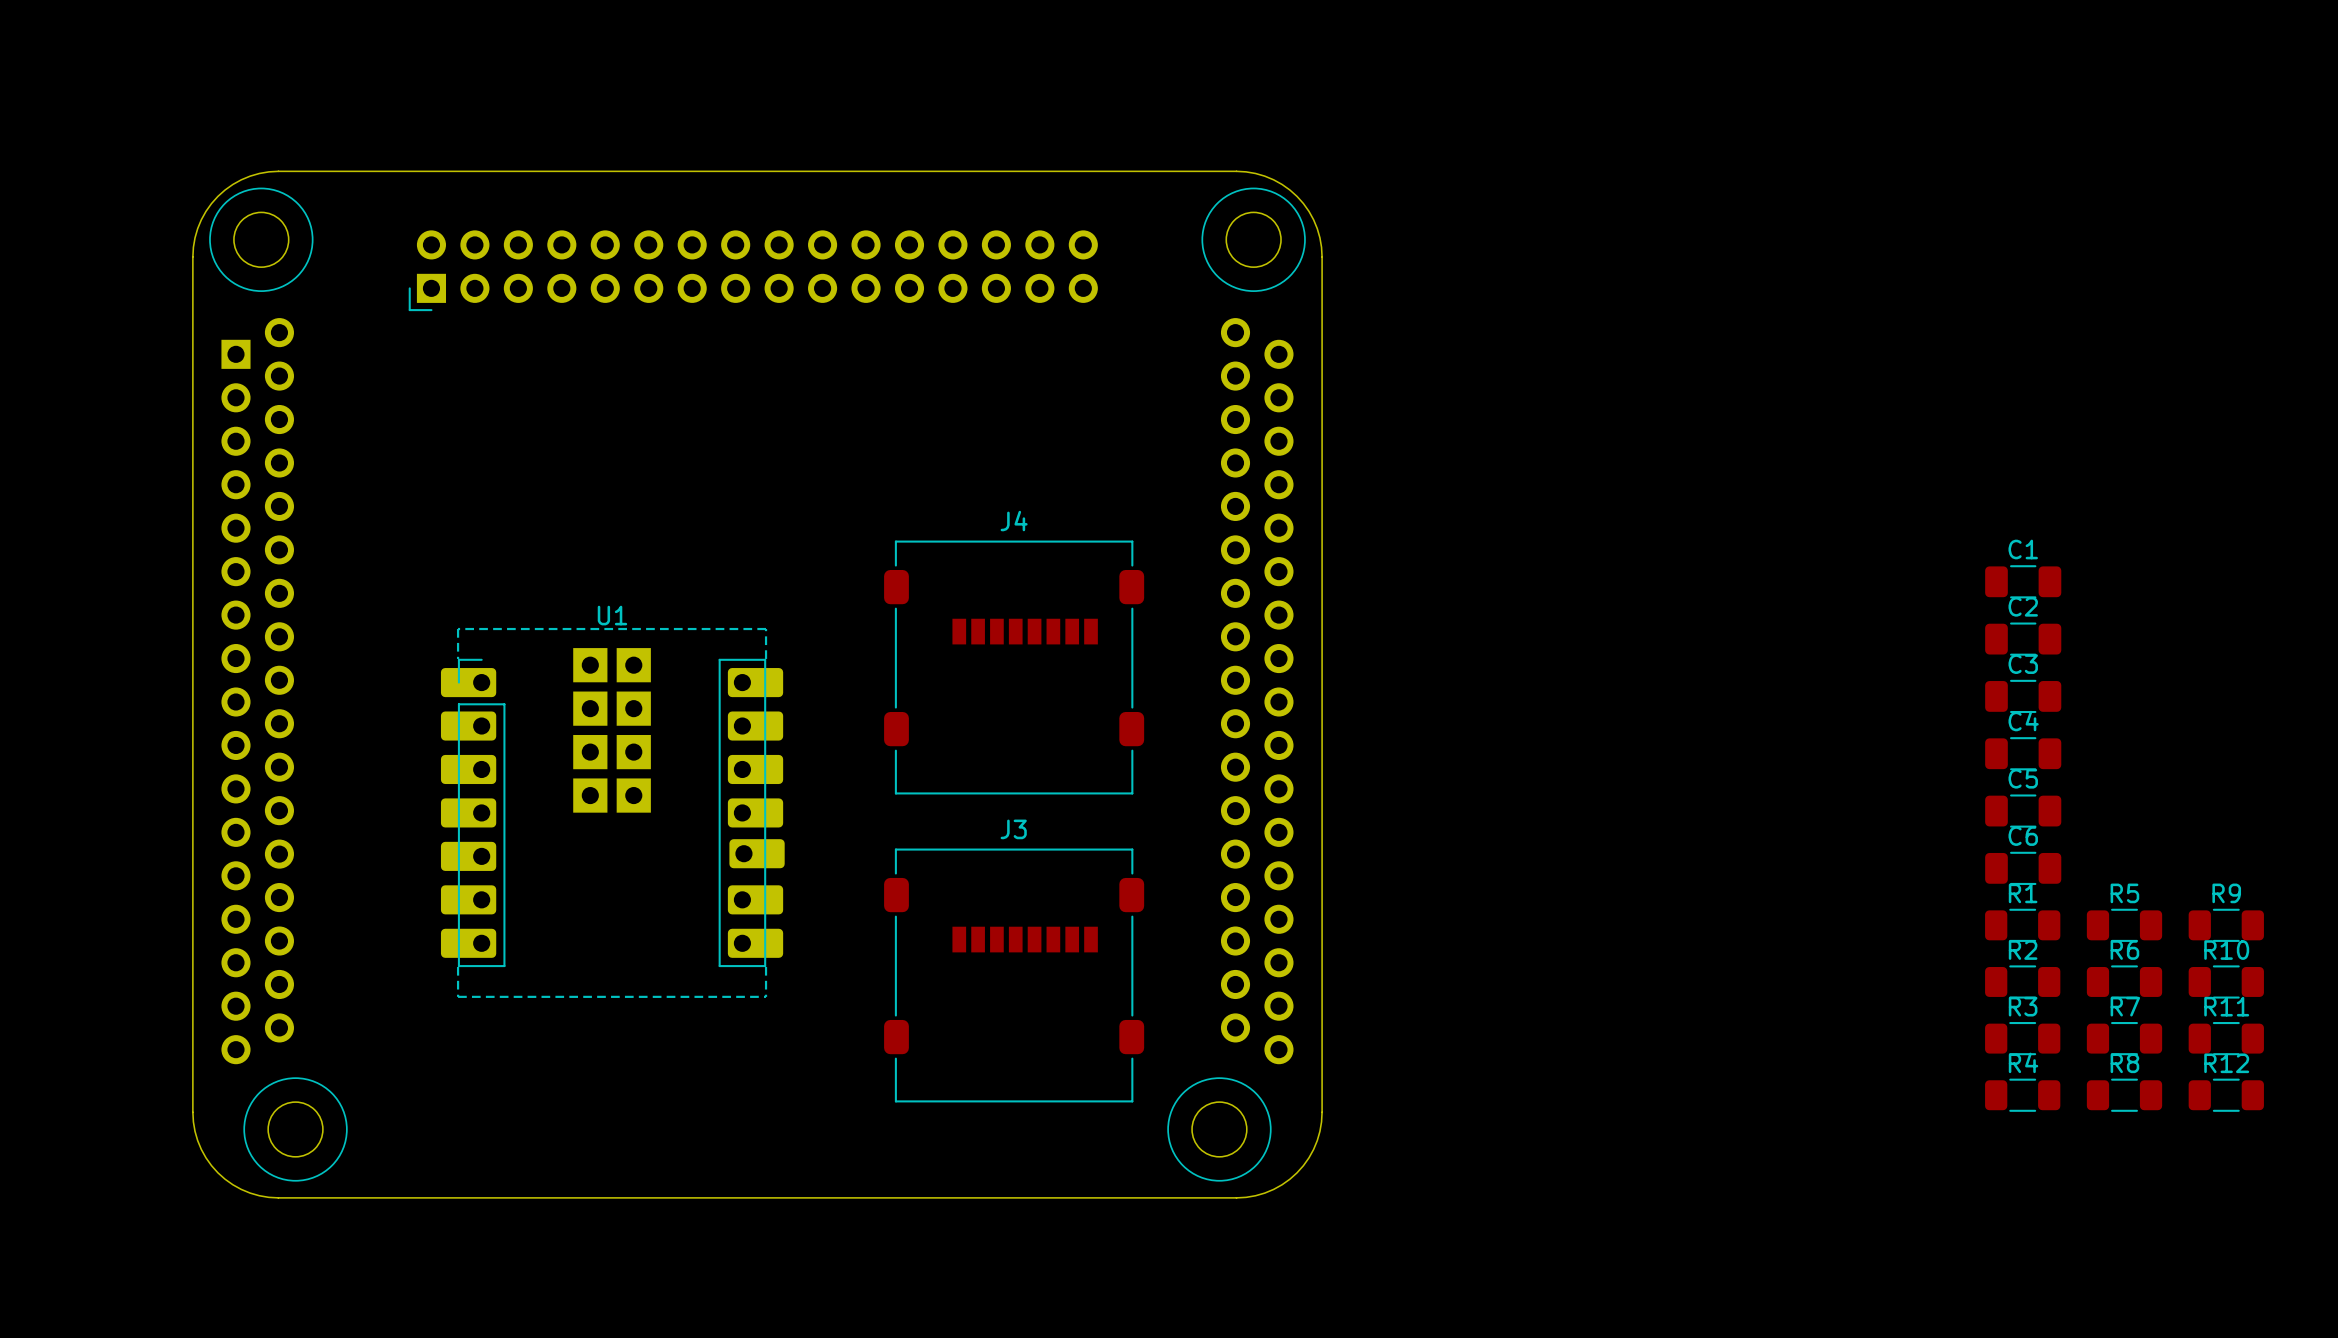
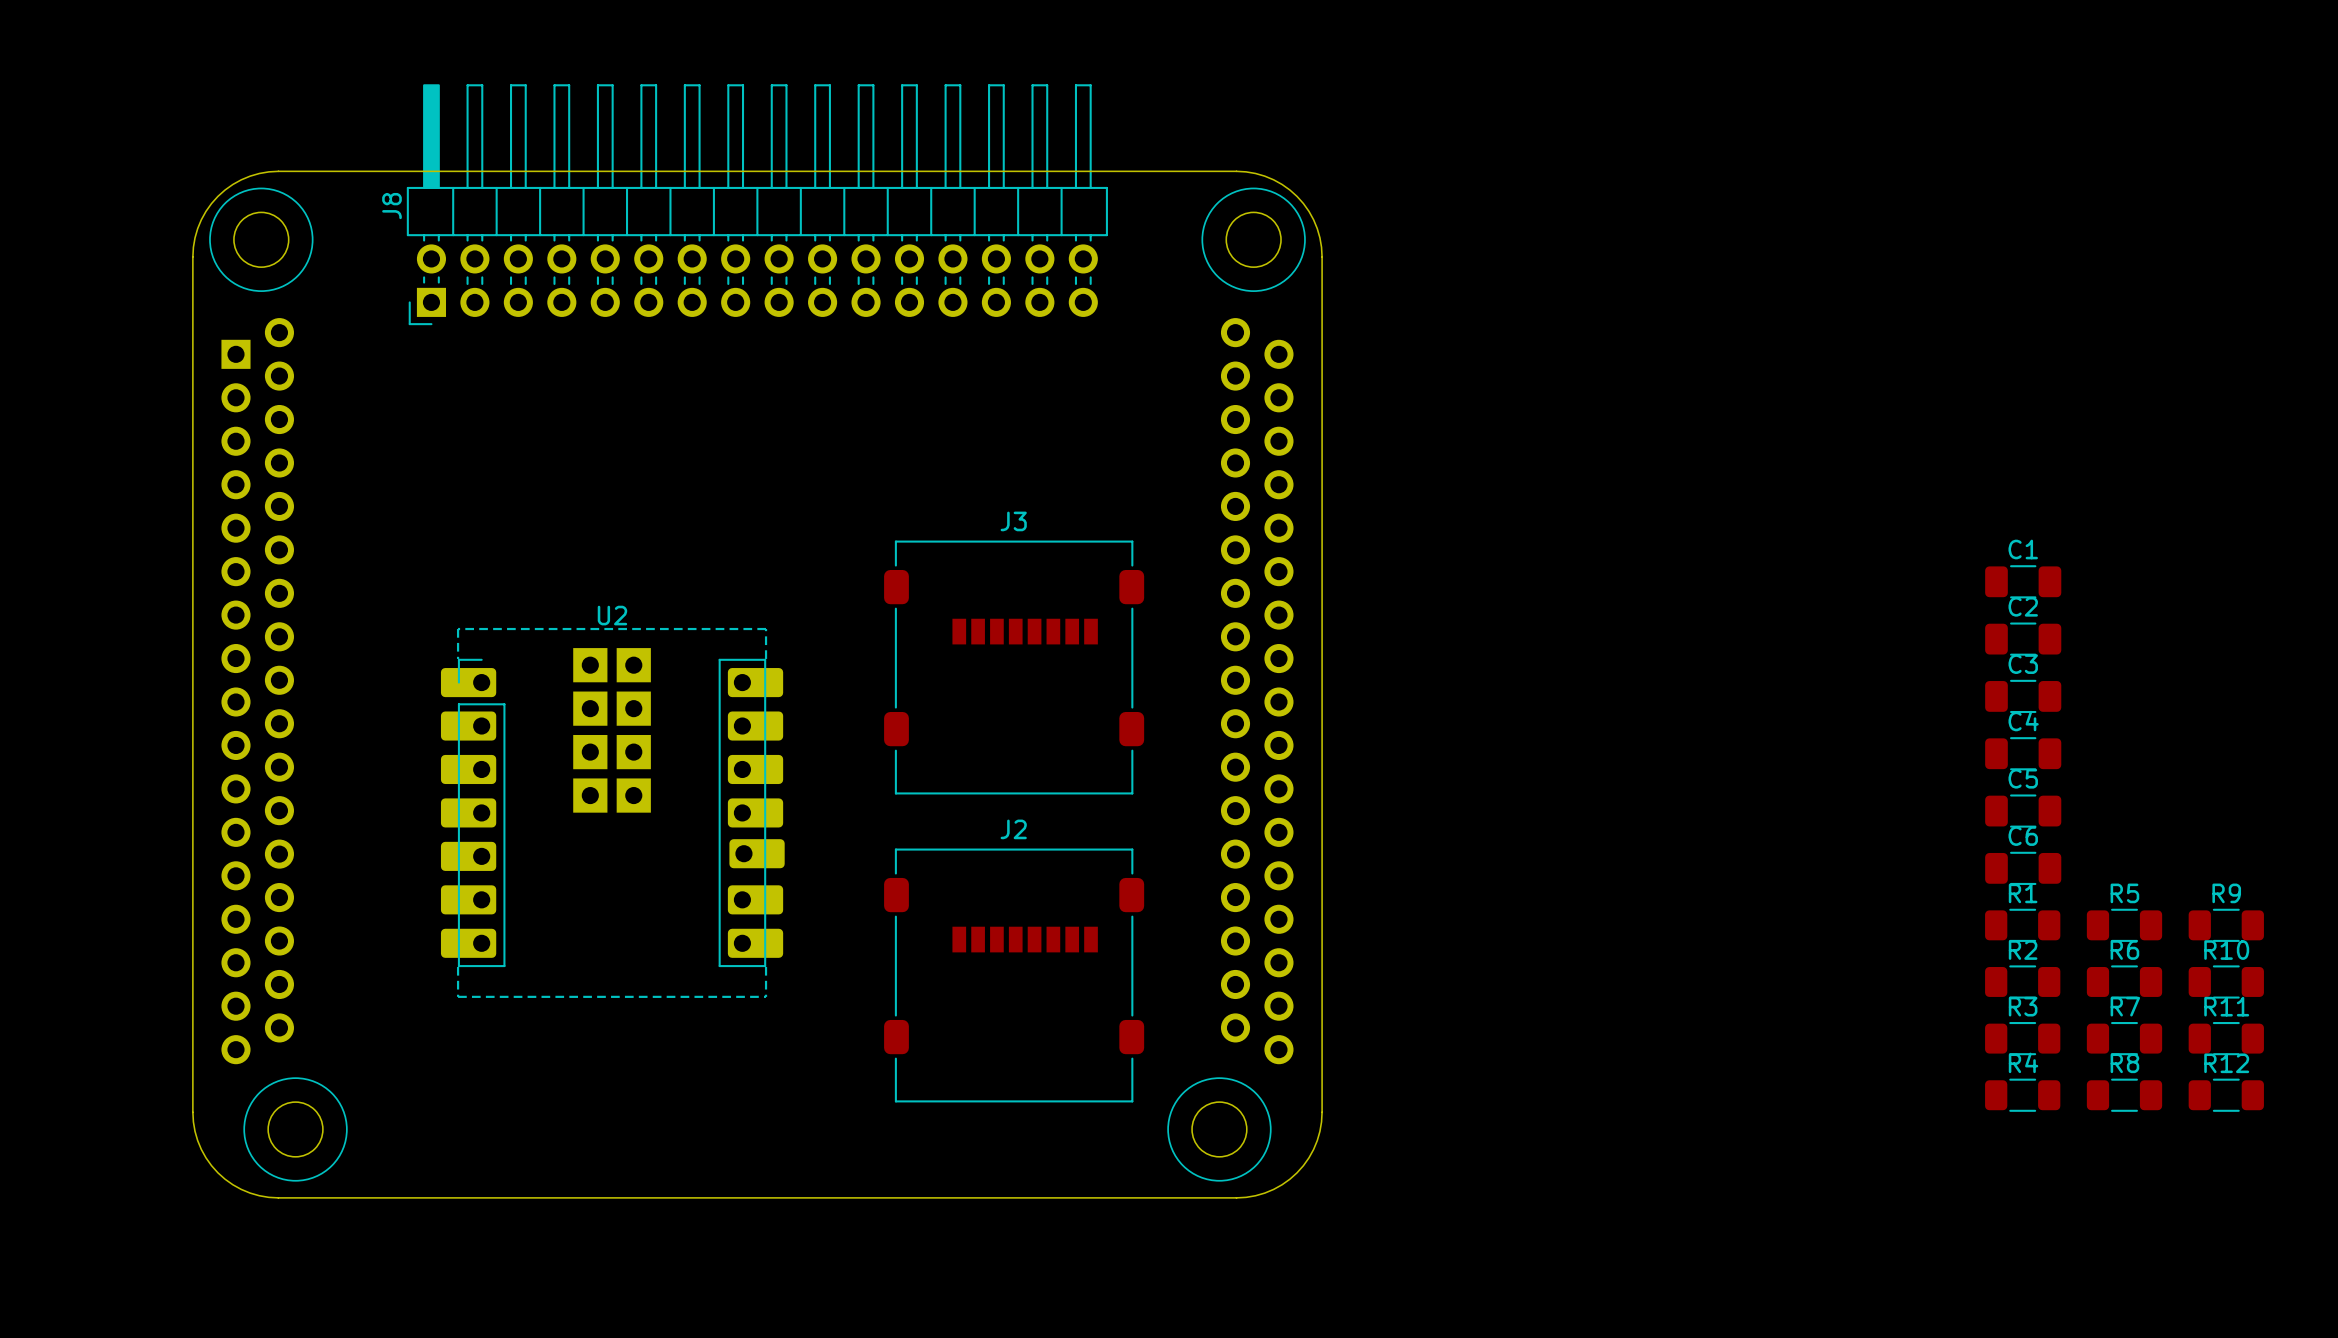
J8: none -> (757, 204)
part: (753, 270) -> none
J4 name: J4 (1014, 521) -> J3 (1013, 521)
U1 name: U1 (612, 615) -> U2 (612, 615)
J3 name: J3 (1013, 829) -> J2 (1013, 829)

